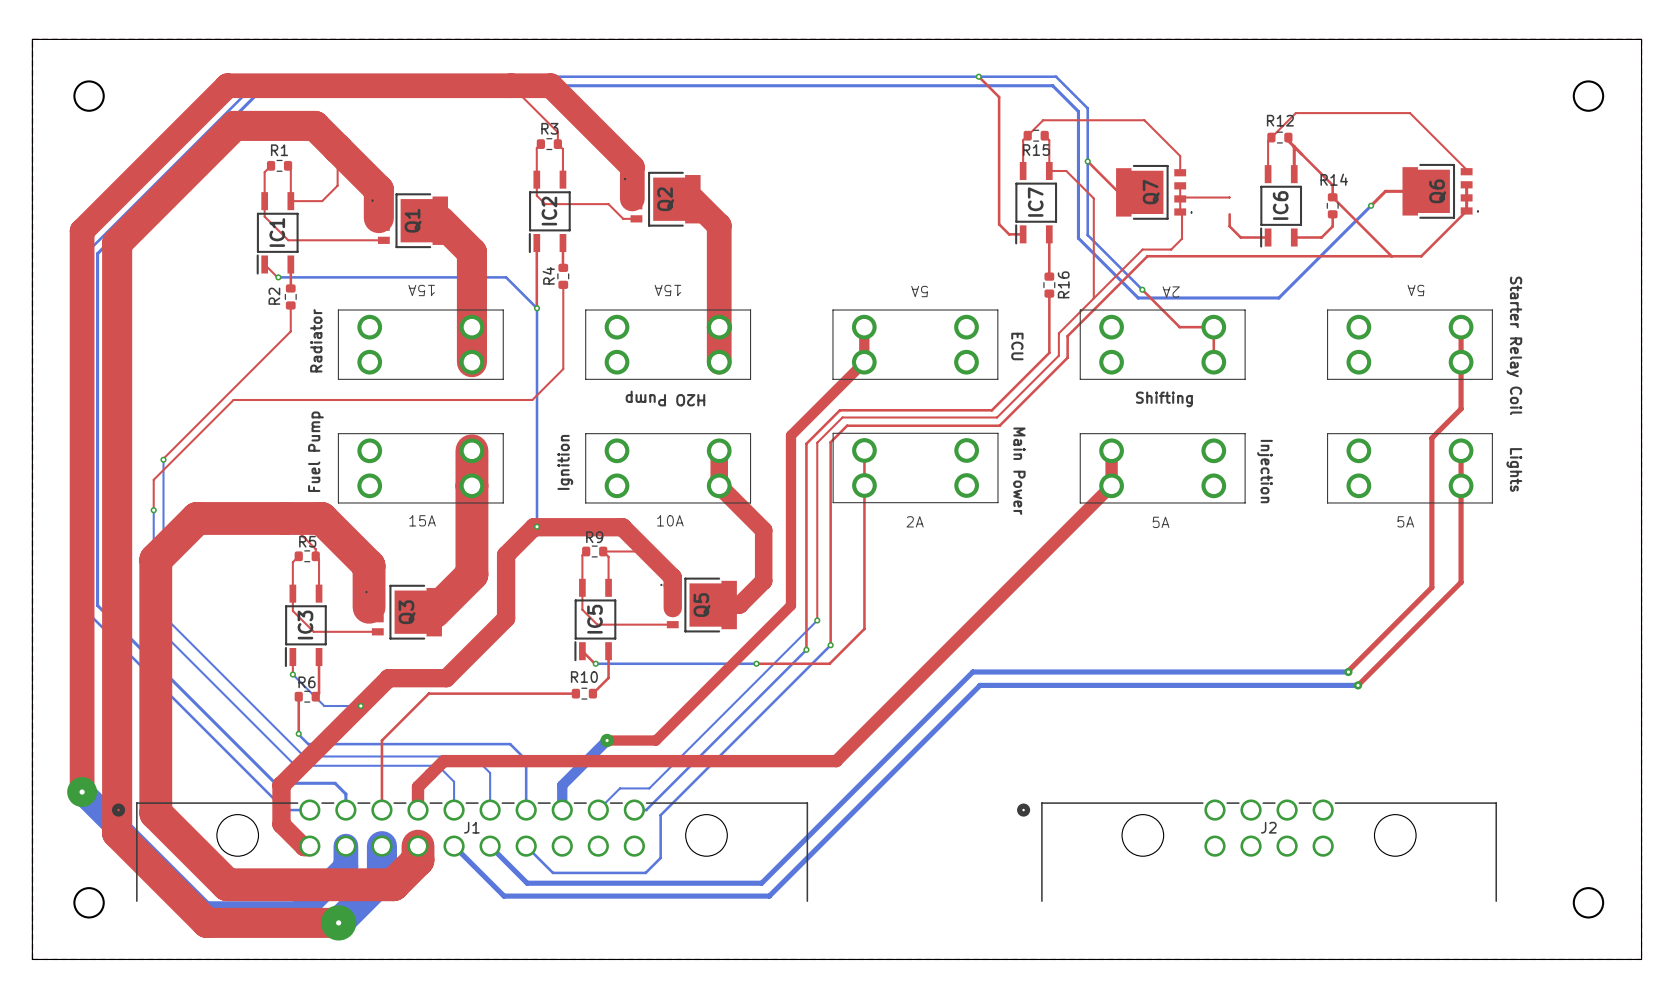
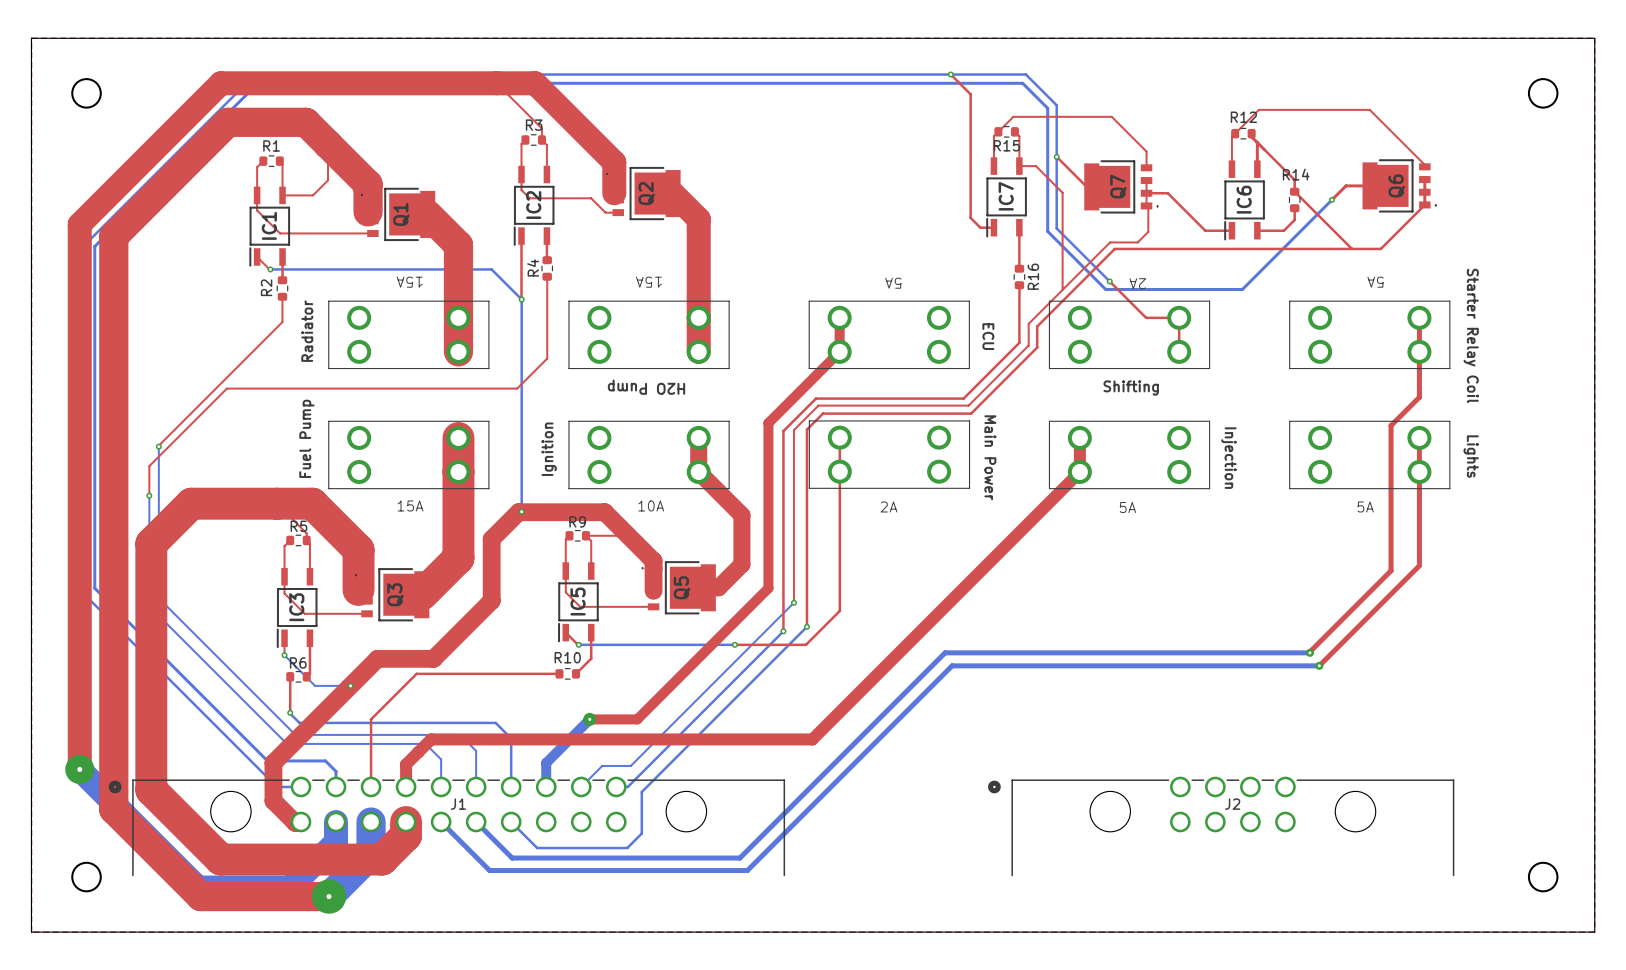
top track: (1229, 197) (1179, 197) -> none
top track: (1229, 214) (1229, 226) -> (1146, 193) (1167, 193) (1194, 219)

